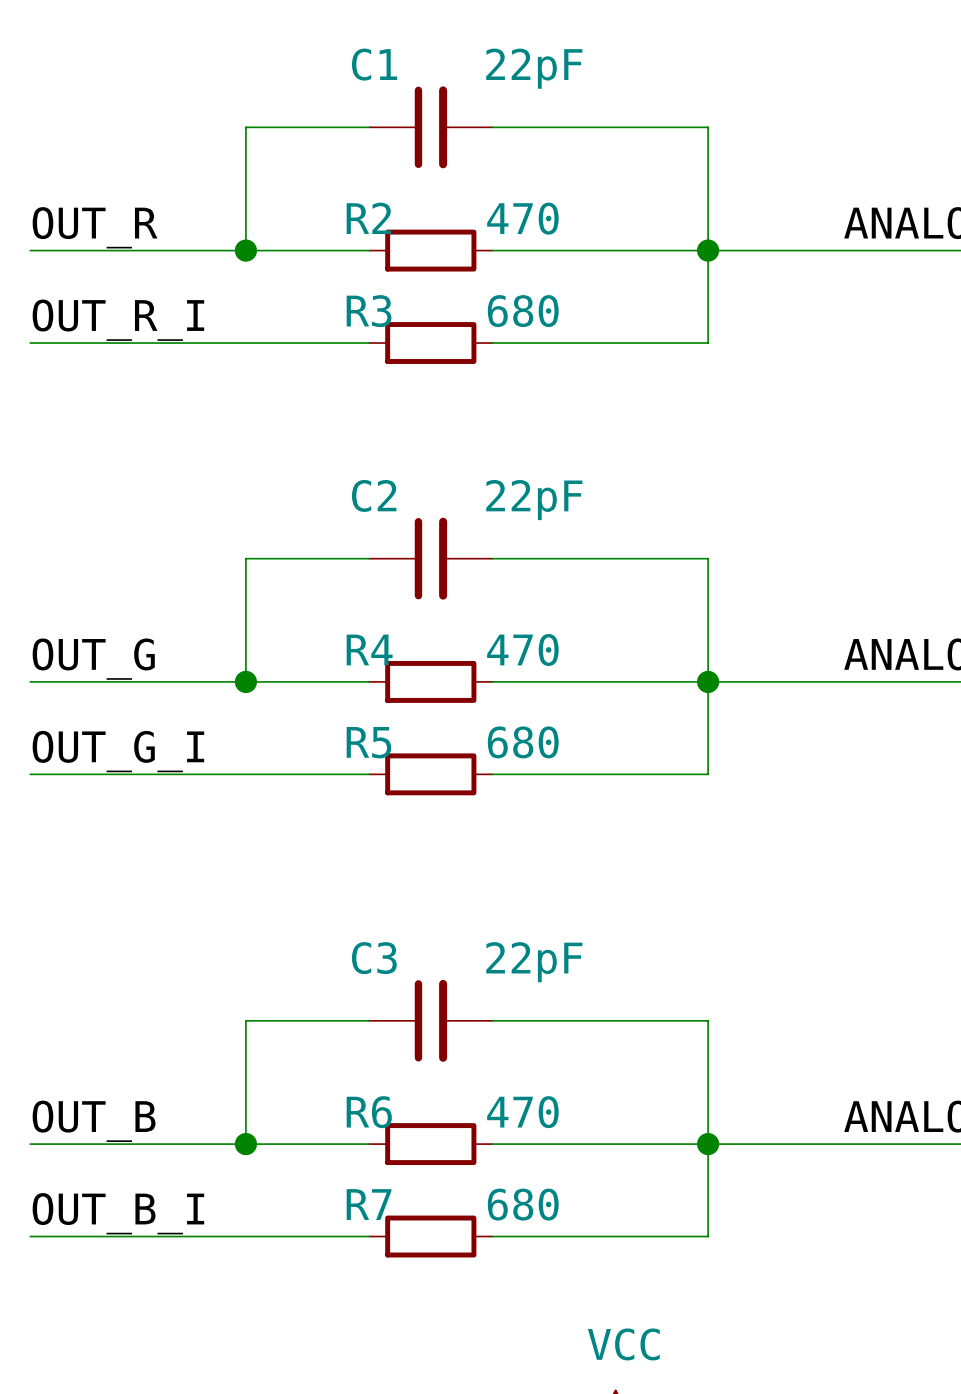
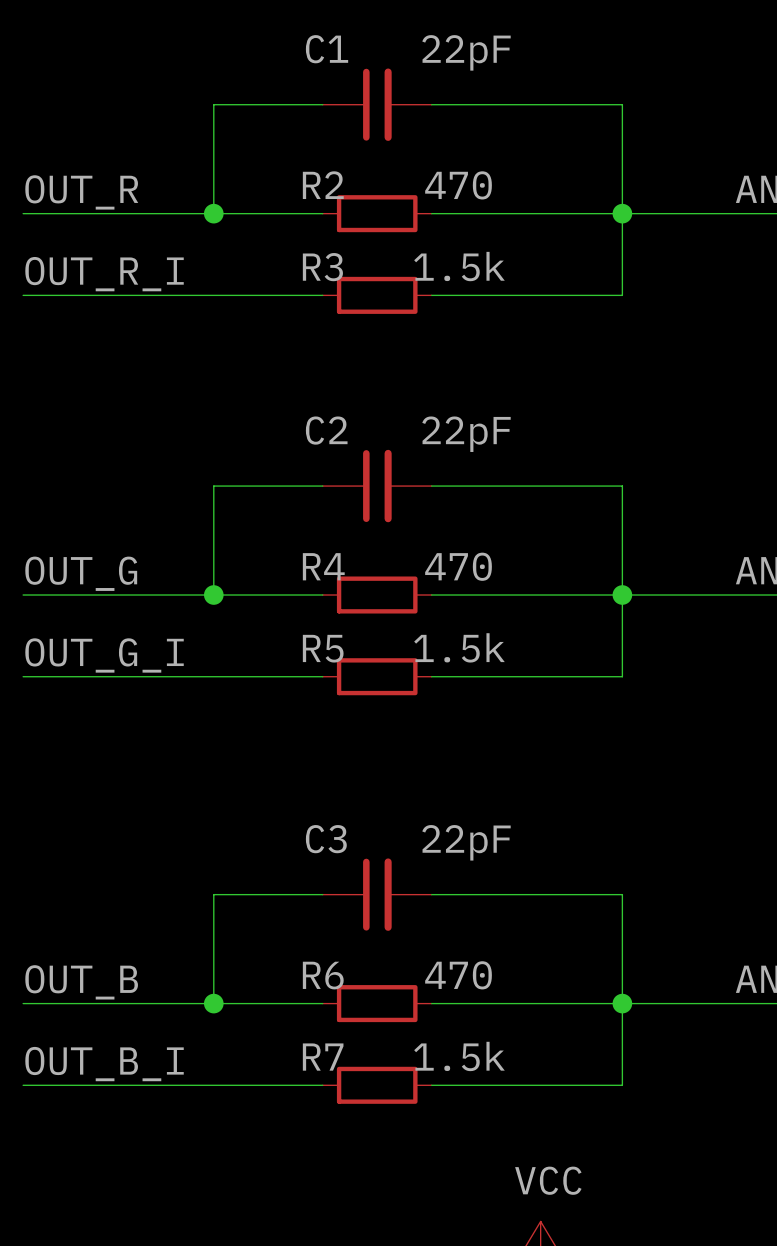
R3 value: 680 (523, 311) -> 1.5k (459, 266)
R5 value: 680 (523, 742) -> 1.5k (459, 647)
R7 value: 680 (523, 1204) -> 1.5k (459, 1056)

